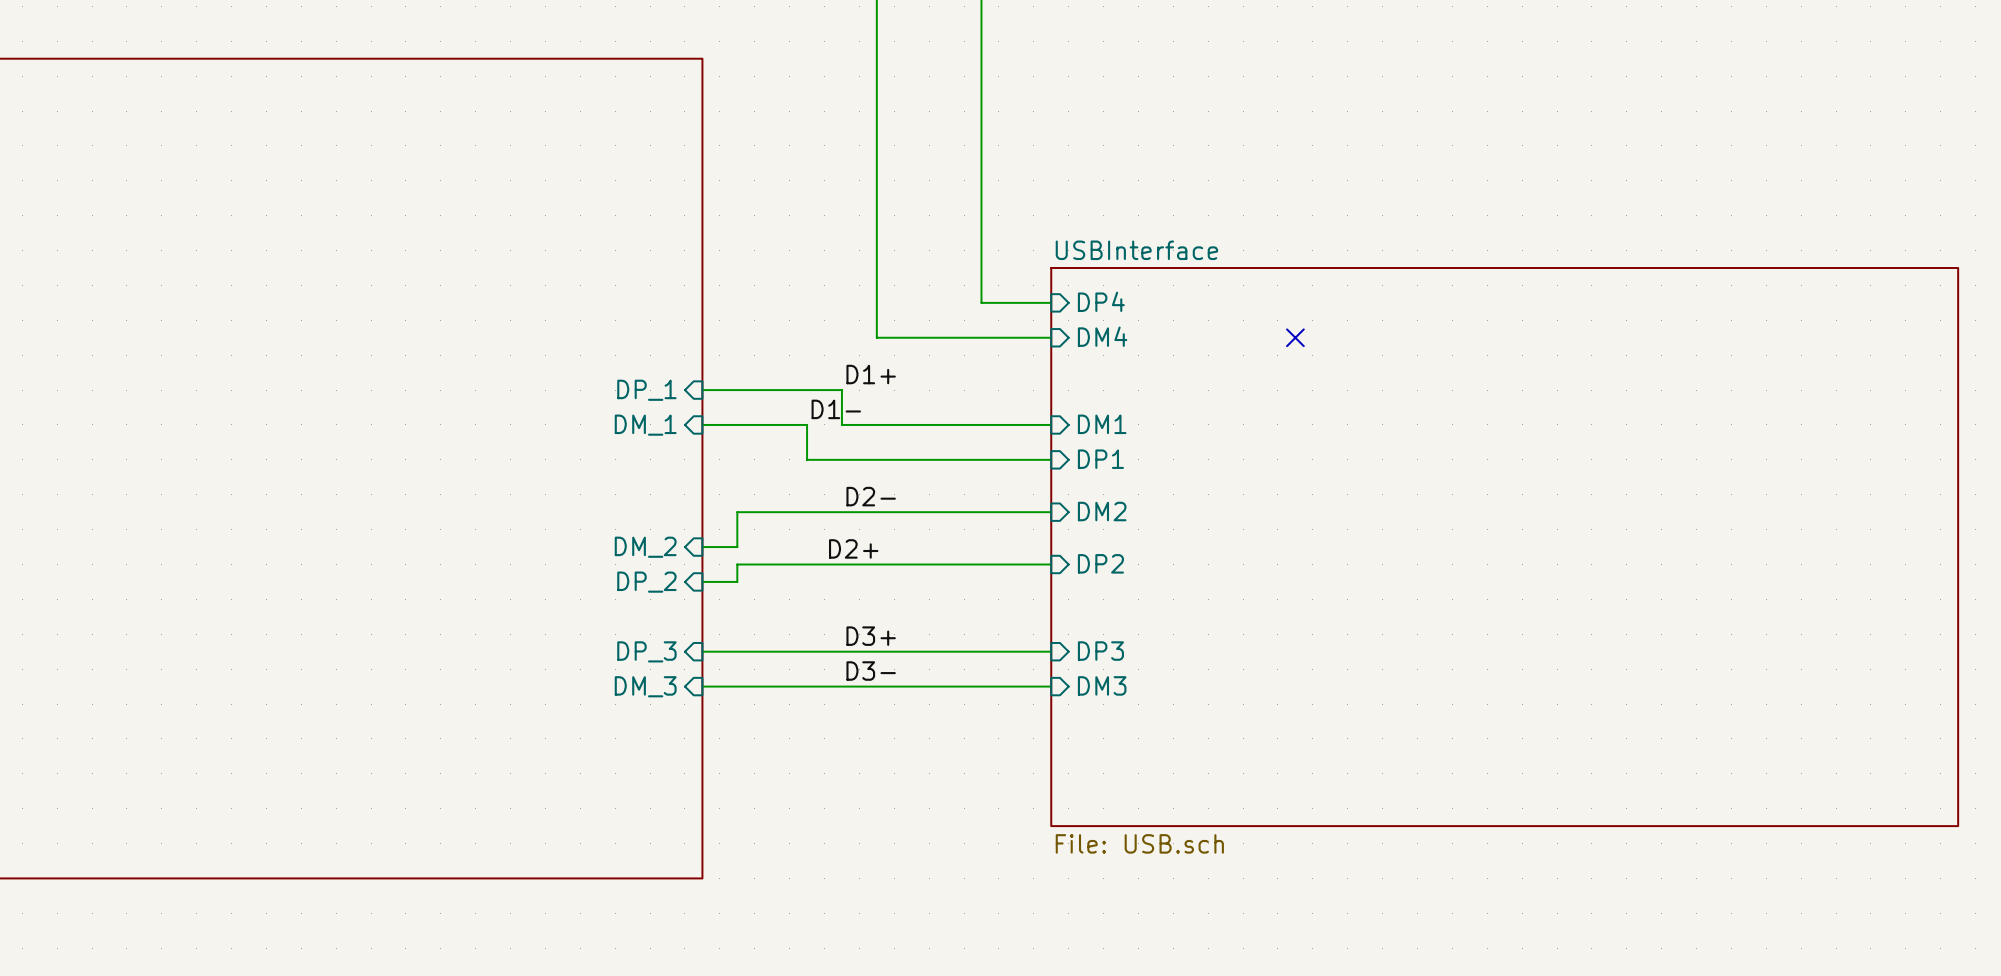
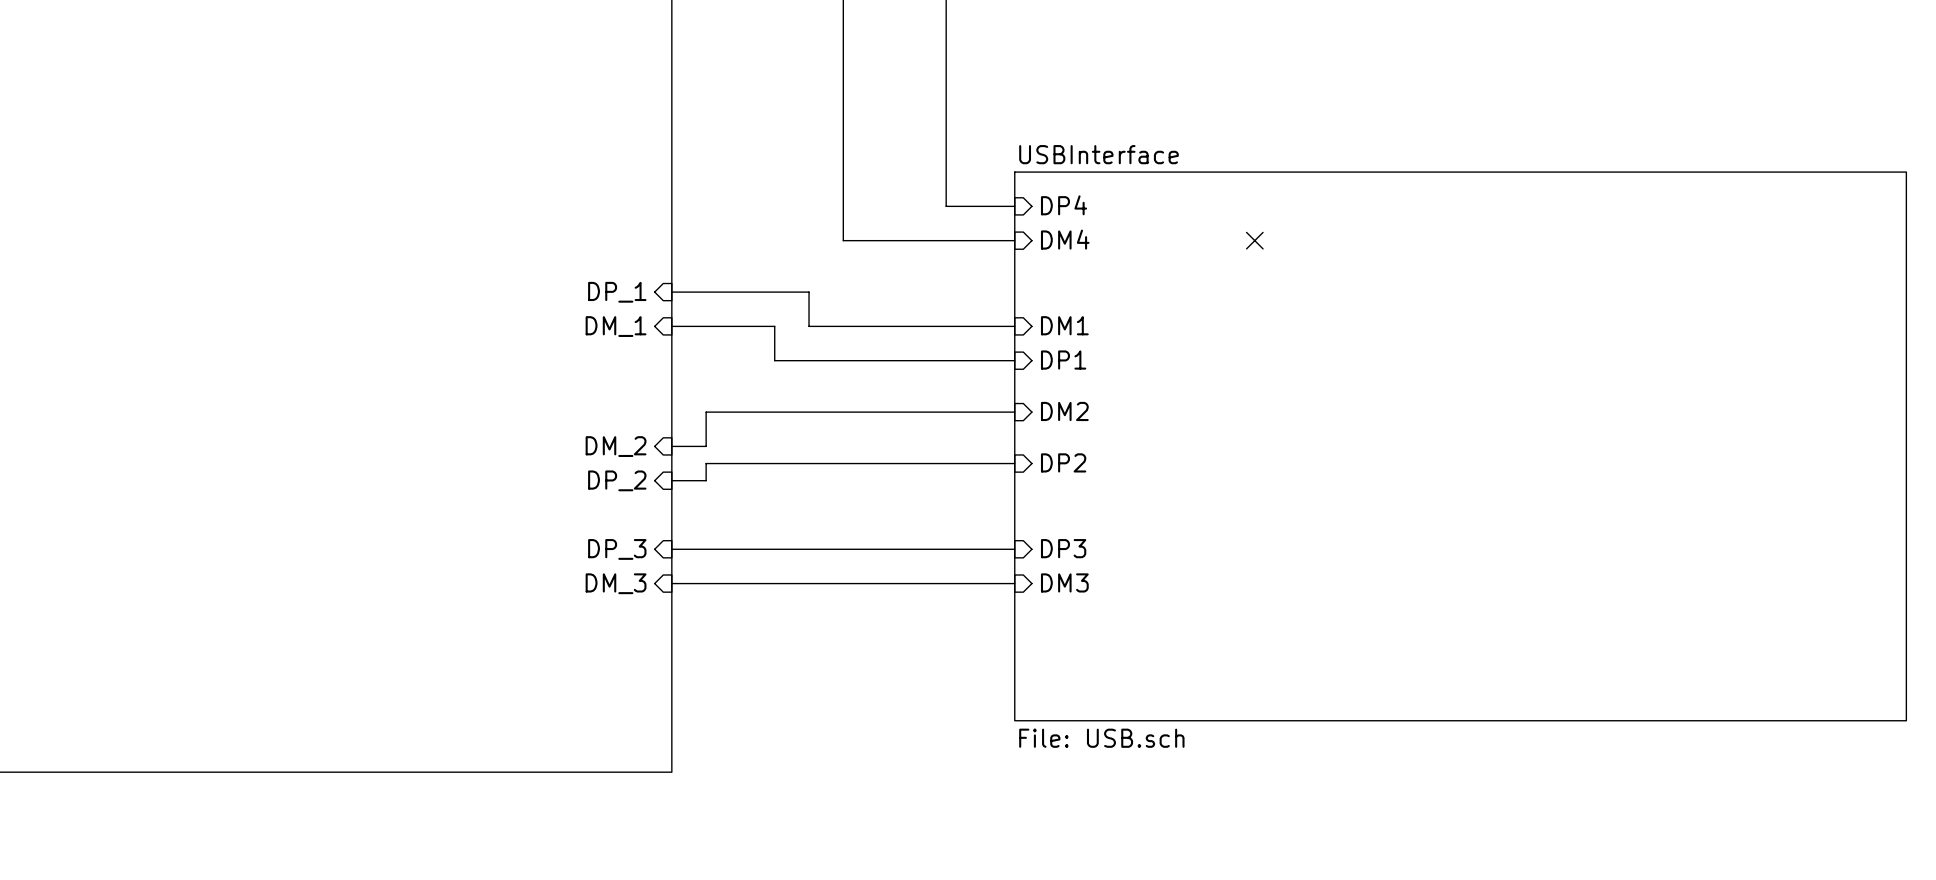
label: D1+ (871, 374) -> none
label: D1- (836, 409) -> none
label: D2- (871, 496) -> none
label: D2+ (853, 548) -> none
label: D3+ (871, 636) -> none
label: D3- (871, 671) -> none

